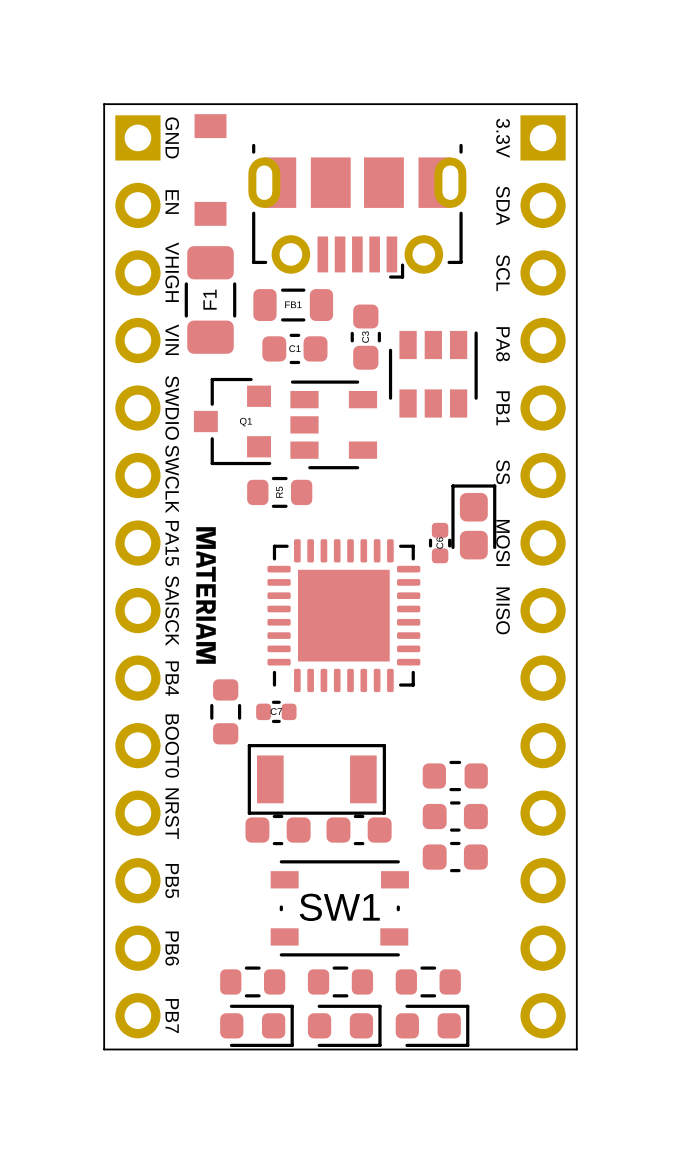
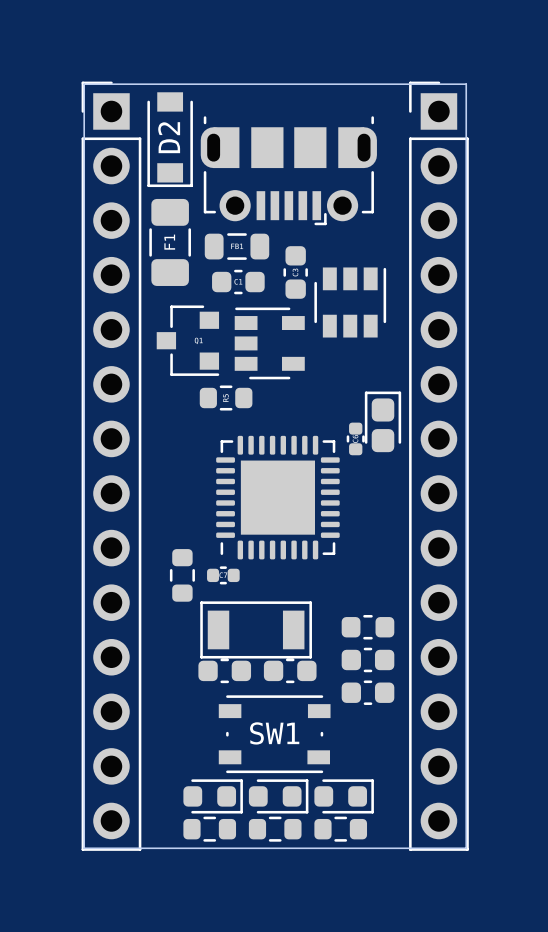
part footprint: [115, 115, 161, 1039] -> [81, 81, 142, 851]
part footprint: [520, 115, 566, 1039] -> [409, 81, 469, 851]
text: GND (172, 137) -> none
text: 3.3V (503, 138) -> none
part: (210, 169) -> none
D2: none -> (170, 139)
text: EN (172, 202) -> none
text: SDA (503, 205) -> none
text: VHIGH (172, 272) -> none
text: SCL (503, 273) -> none
text: VIN (172, 339) -> none
text: PA8 (503, 344) -> none
text: SWDIO (172, 407) -> none
text: PB1 (503, 408) -> none
text: SS (503, 472) -> none
text: SWCLK (172, 479) -> none
drawing: [196, 527, 216, 664] -> none
text: MOSI (503, 542) -> none
text: PA15 (172, 543) -> none
text: SAISCK (172, 610) -> none
text: MISO (503, 610) -> none
text: PB4 (172, 678) -> none
text: BOOT0 (172, 746) -> none
text: NRST (172, 813) -> none
text: PB5 (172, 881) -> none
text: PB6 (172, 948) -> none
part footprint: [220, 966, 286, 998] -> [183, 779, 243, 814]
part footprint: [307, 966, 374, 998] -> [248, 779, 309, 814]
part footprint: [395, 966, 461, 998] -> [314, 779, 374, 814]
part footprint: [220, 1004, 294, 1047] -> [183, 816, 237, 842]
part footprint: [307, 1004, 382, 1047] -> [248, 816, 302, 842]
part footprint: [395, 1004, 470, 1047] -> [314, 816, 368, 842]
text: PB7 (172, 1016) -> none

